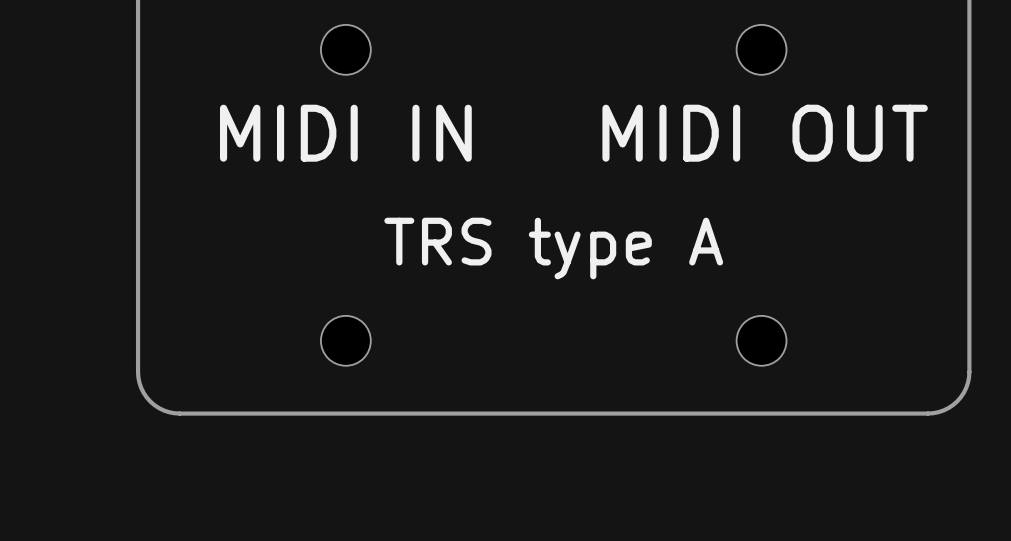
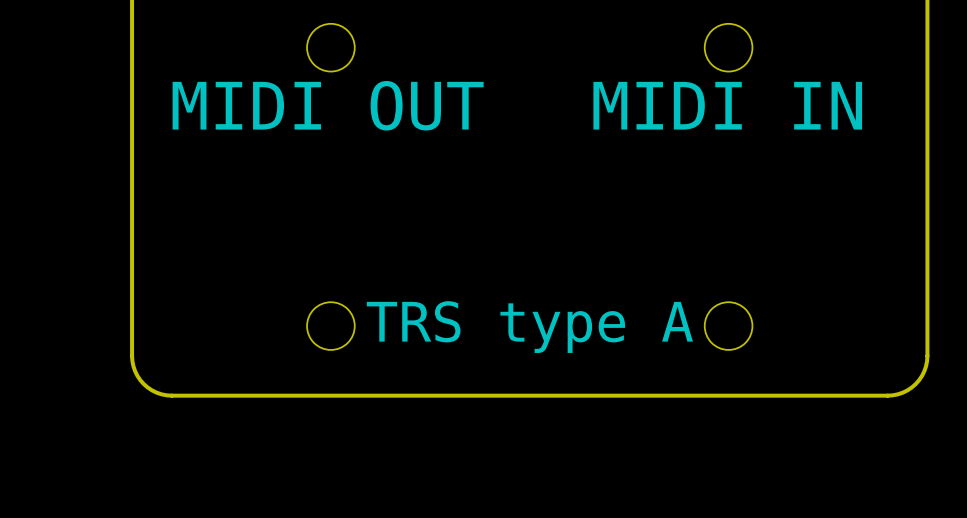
text position: MIDI IN (345, 133) -> MIDI IN (727, 105)
text position: MIDI OUT (765, 133) -> MIDI OUT (328, 105)
text position: TRS type A (553, 248) -> TRS type A (529, 327)

